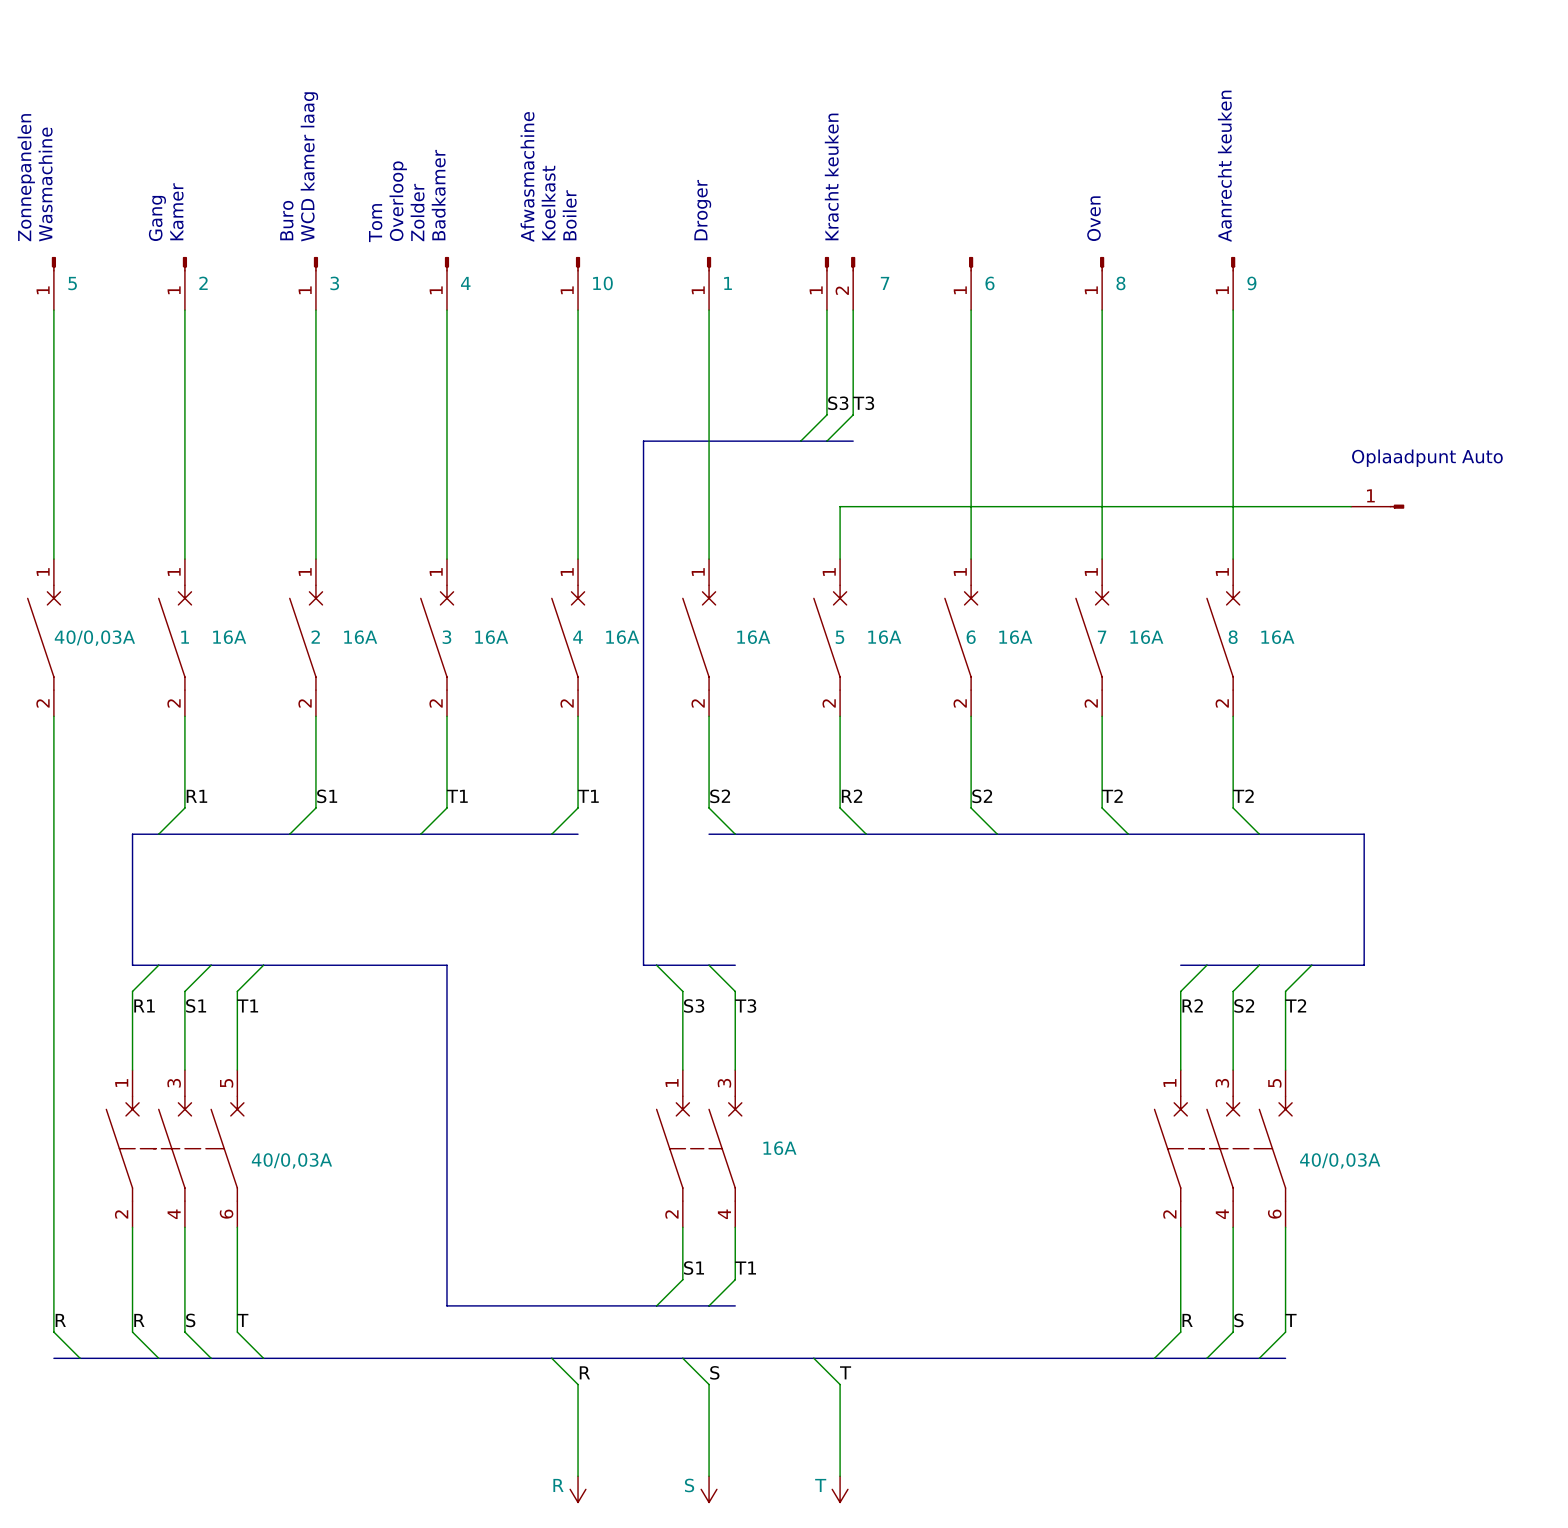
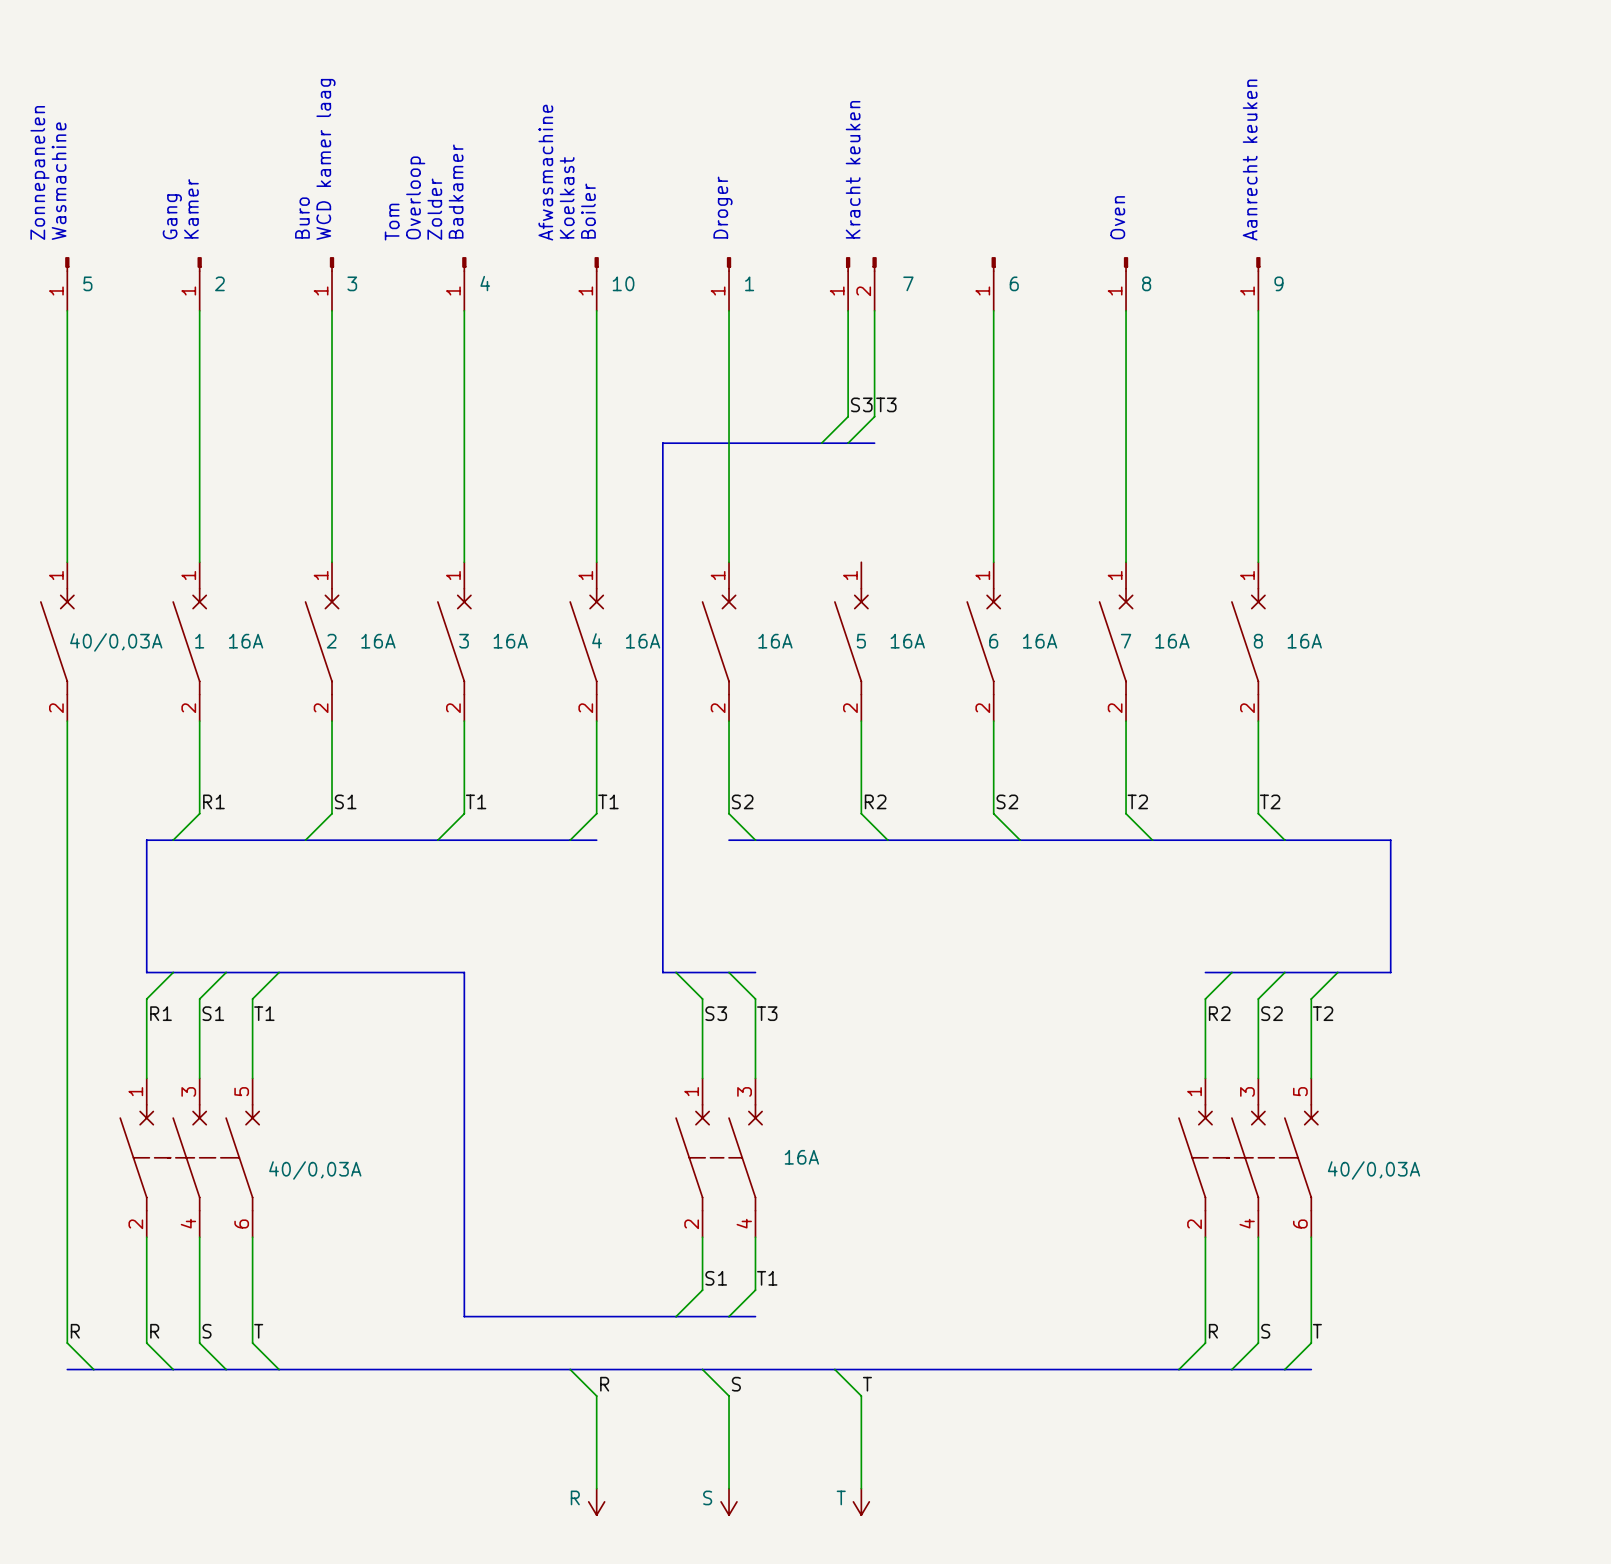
text: Oplaadpunt Auto (1427, 458) -> none
wire: (1351, 506) (840, 506) (840, 559) -> none
part: (1377, 506) -> none

